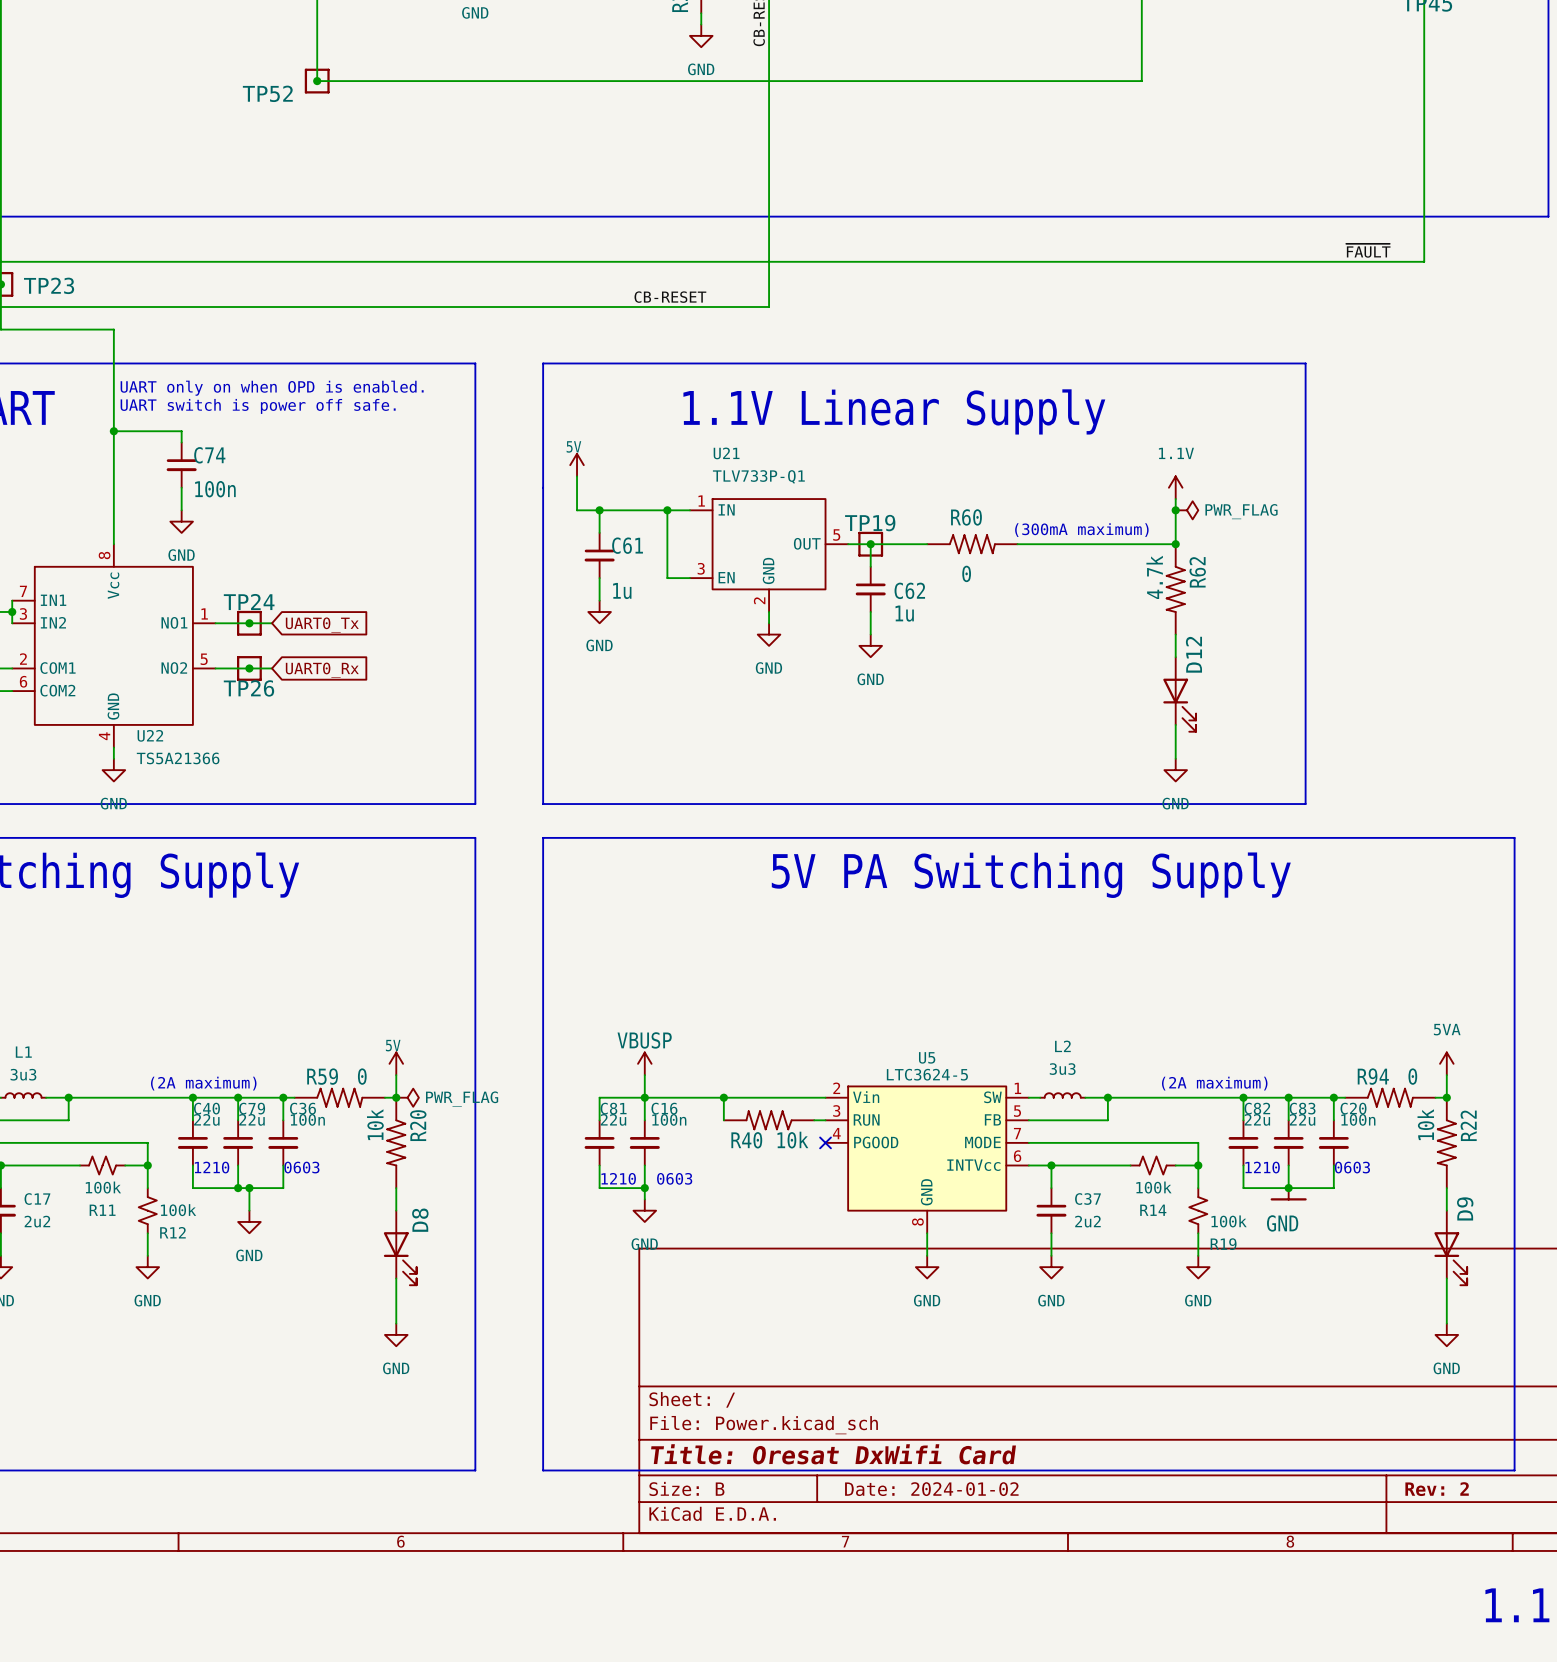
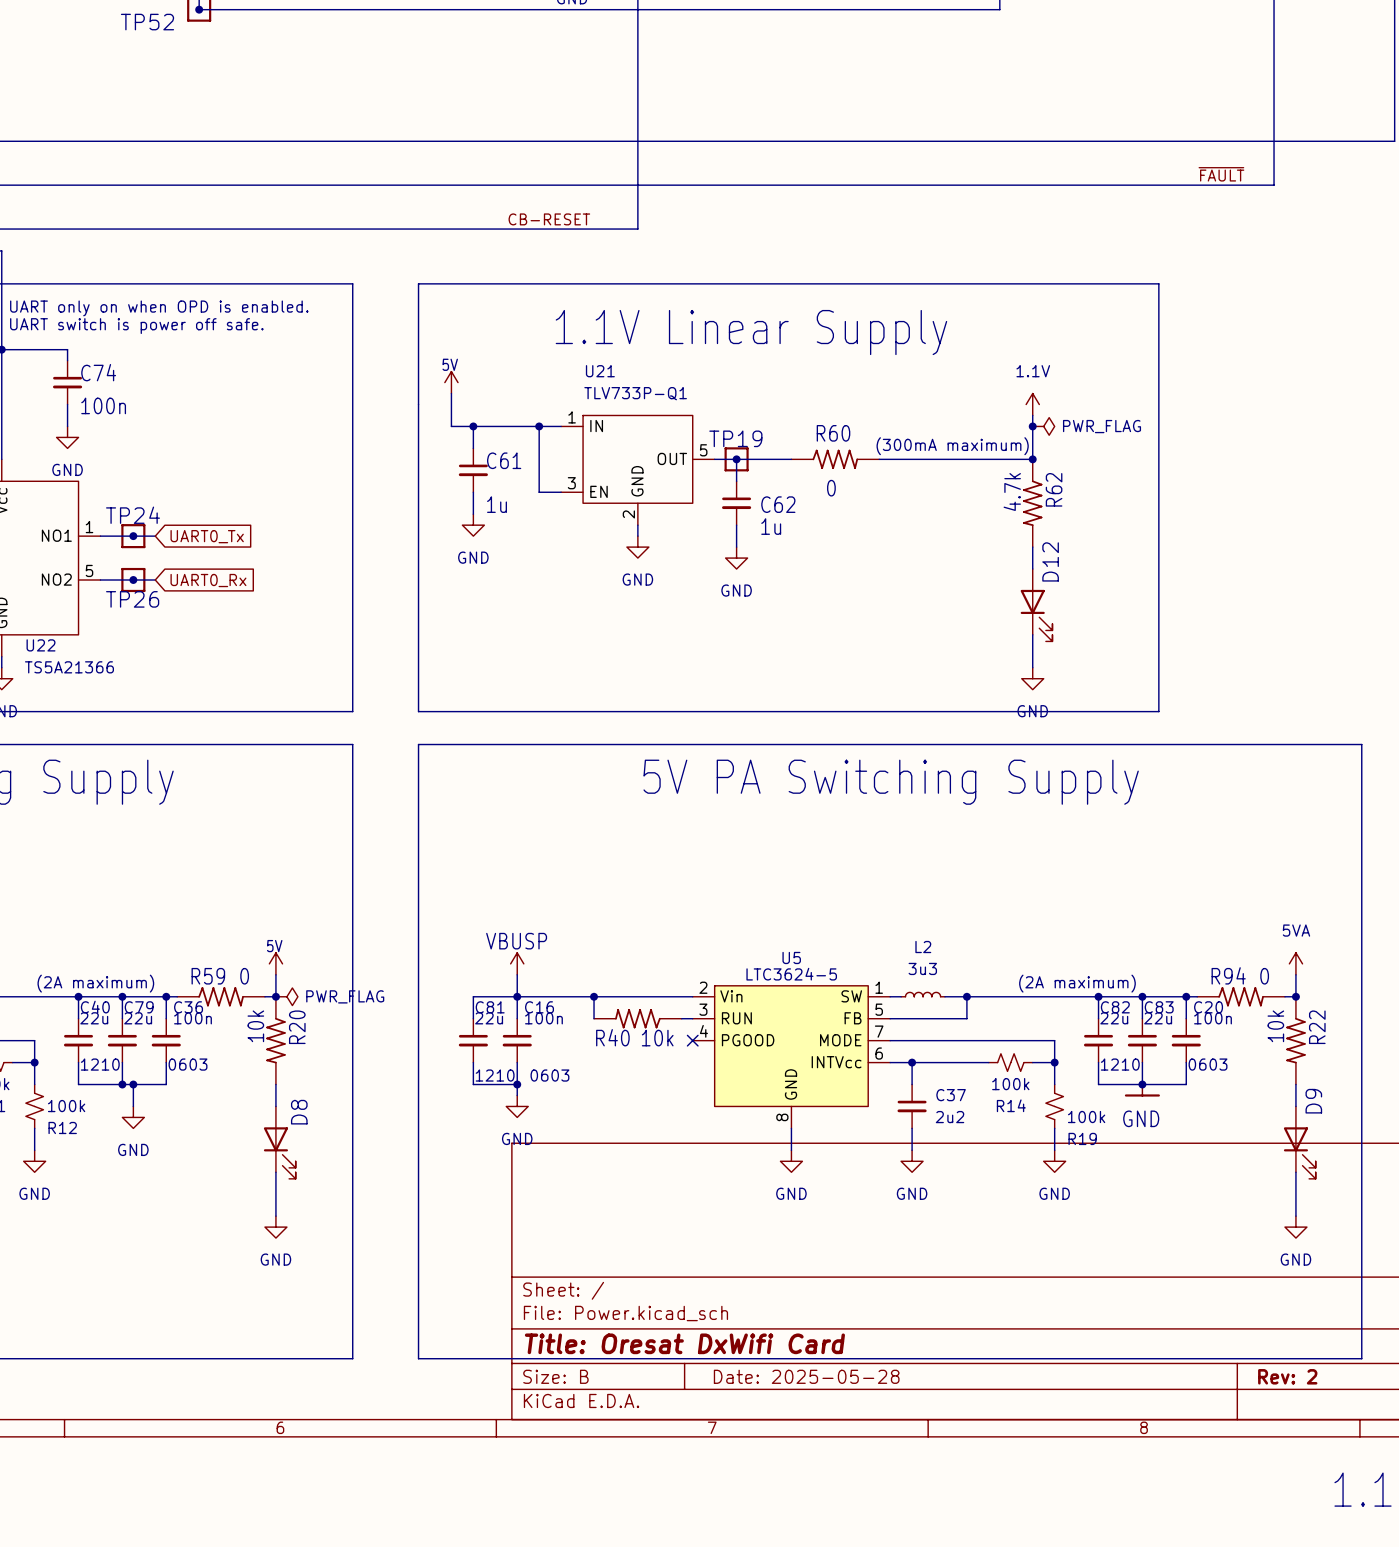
title block: Date: 2024-01-02 (931, 1489) -> Date: 2025-05-28 (806, 1376)

